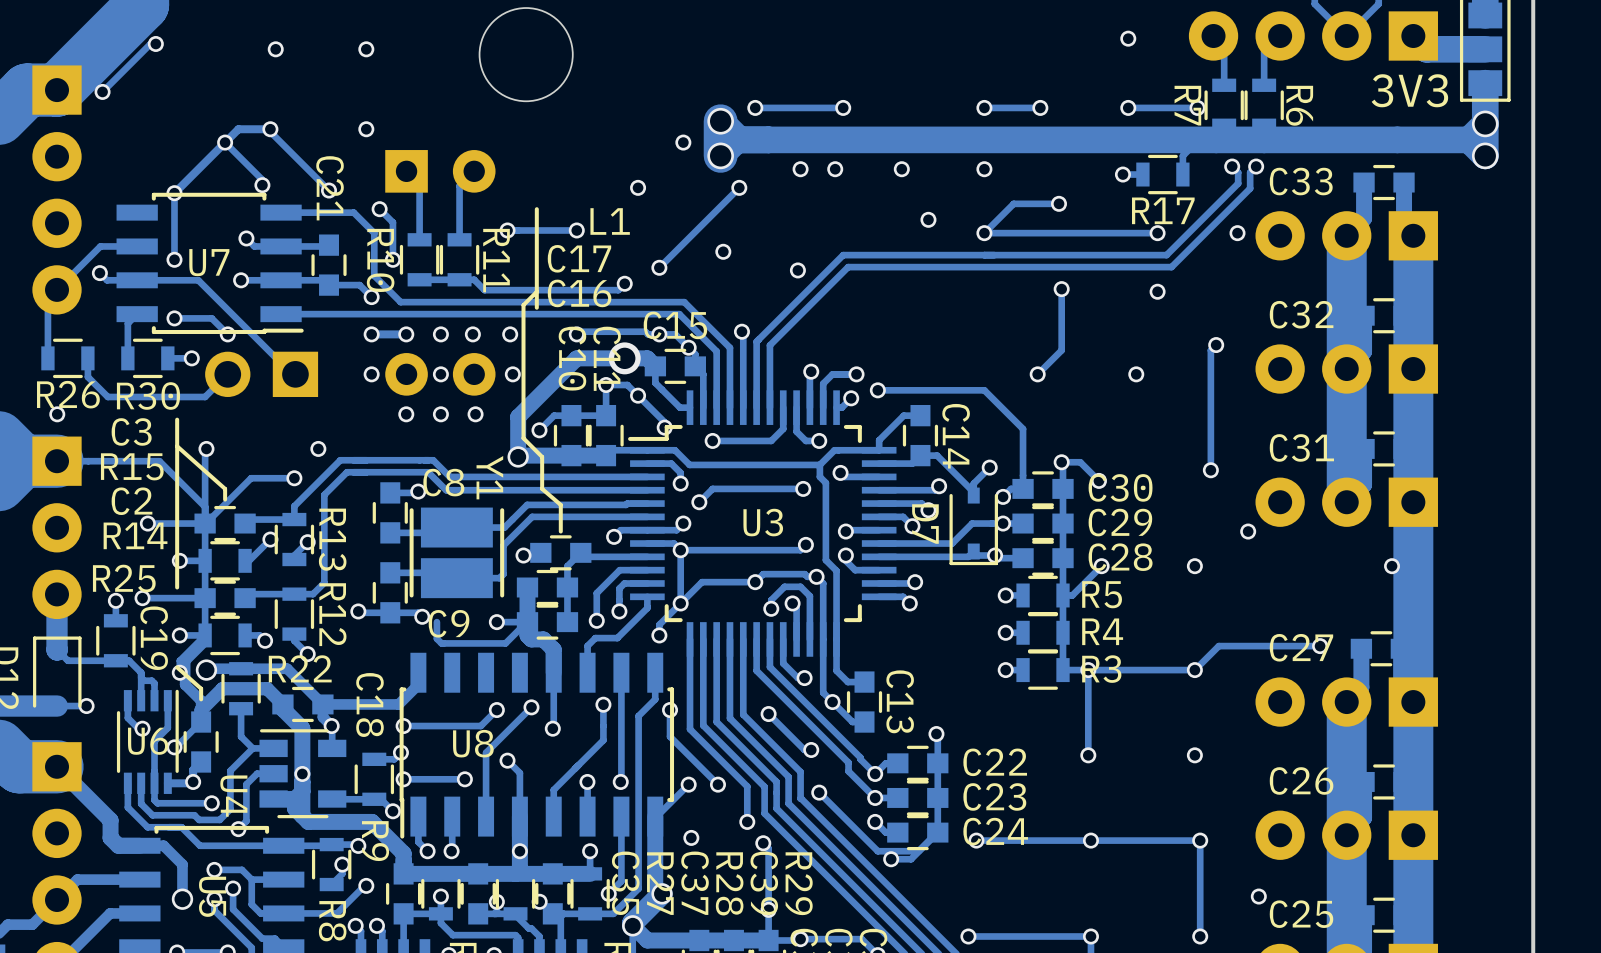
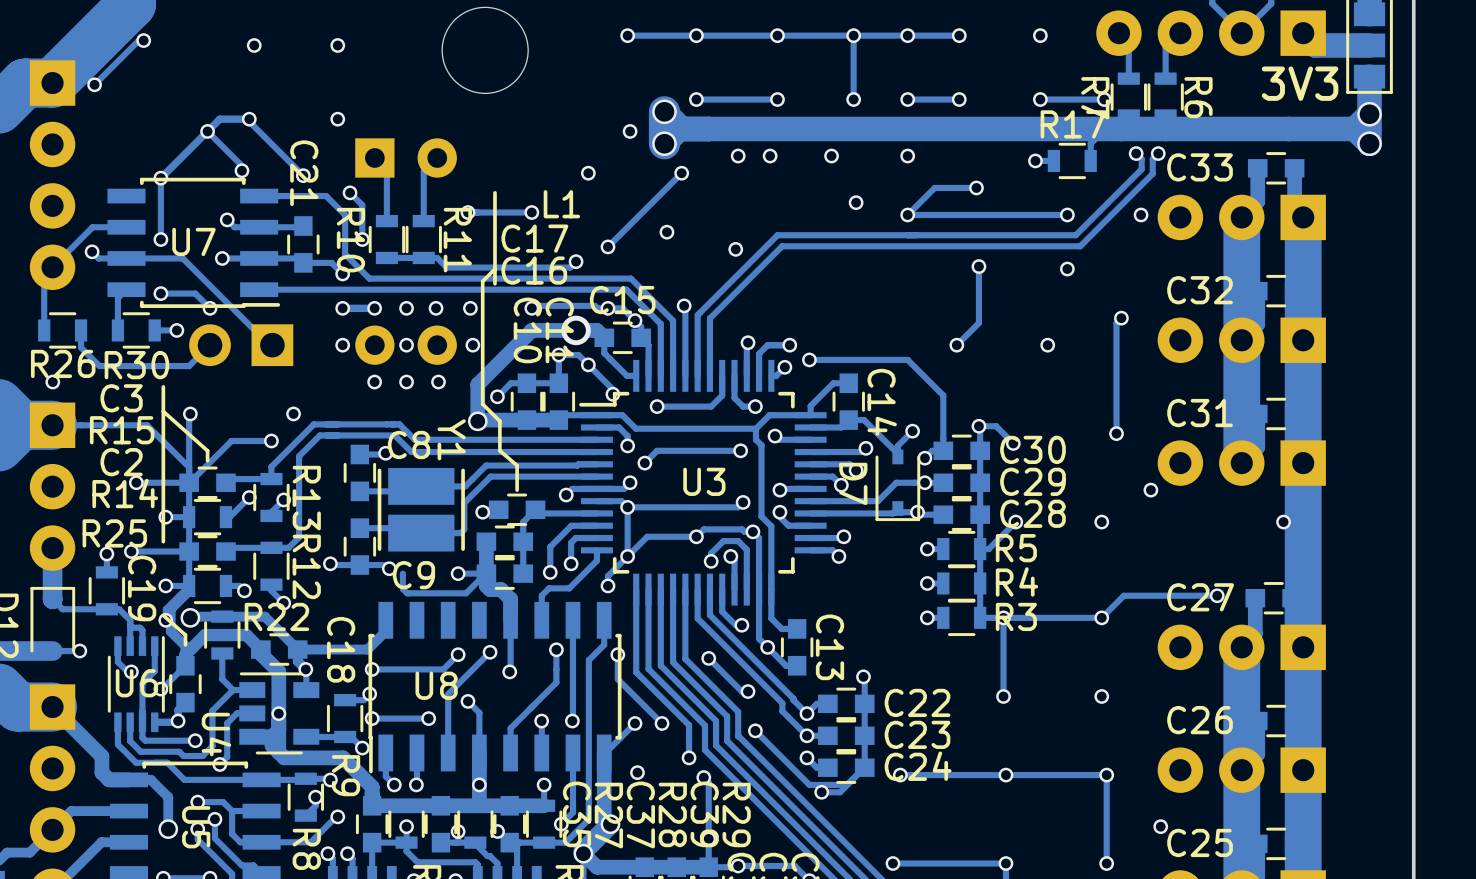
via: none -> (627, 35)
via: none -> (696, 35)
via: none -> (777, 35)
track: none -> (853, 35) (853, 99)
via: none -> (853, 35)
via: none -> (907, 35)
track: none -> (959, 35) (627, 35)
via: none -> (959, 35)
via: none -> (853, 99)
R17 name position: R17 (1163, 210) -> R17 (1073, 124)

